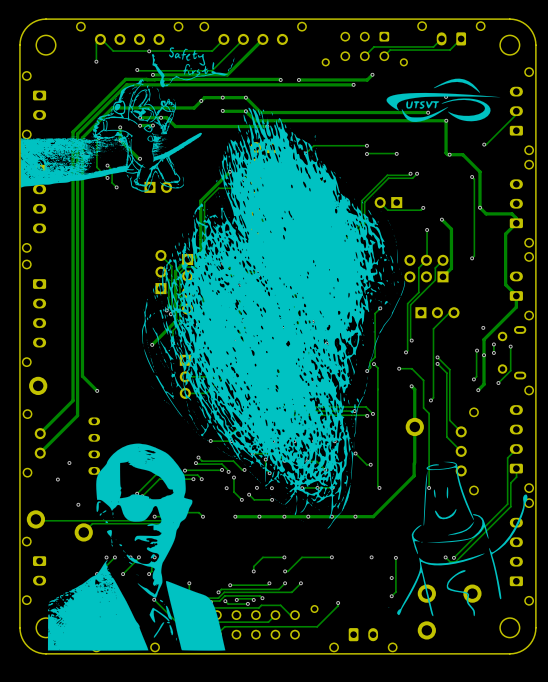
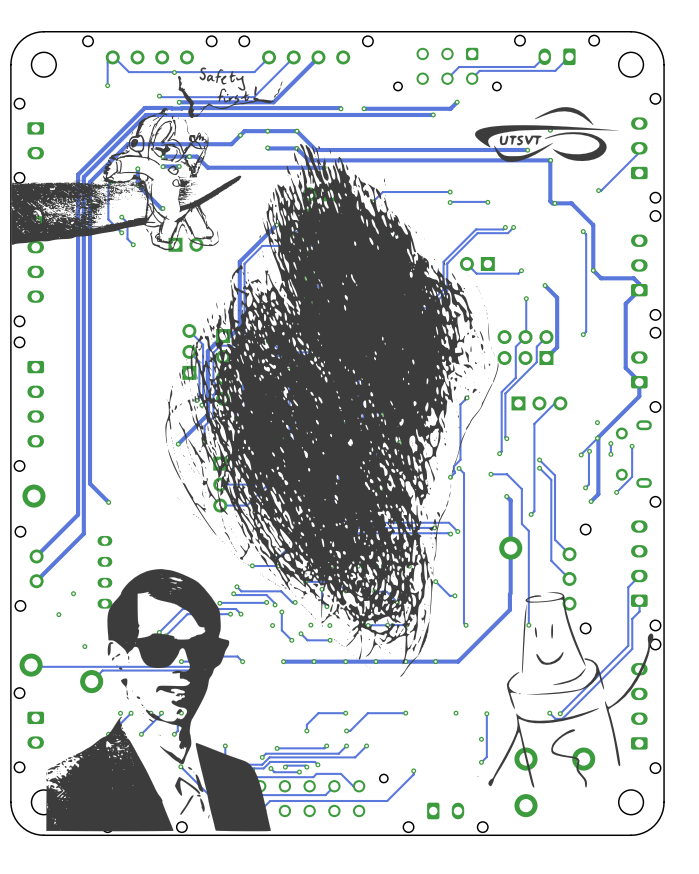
track: none -> (597, 438) (581, 454)
via: none -> (597, 438)
via: none -> (581, 454)
via: (484, 355) -> none

